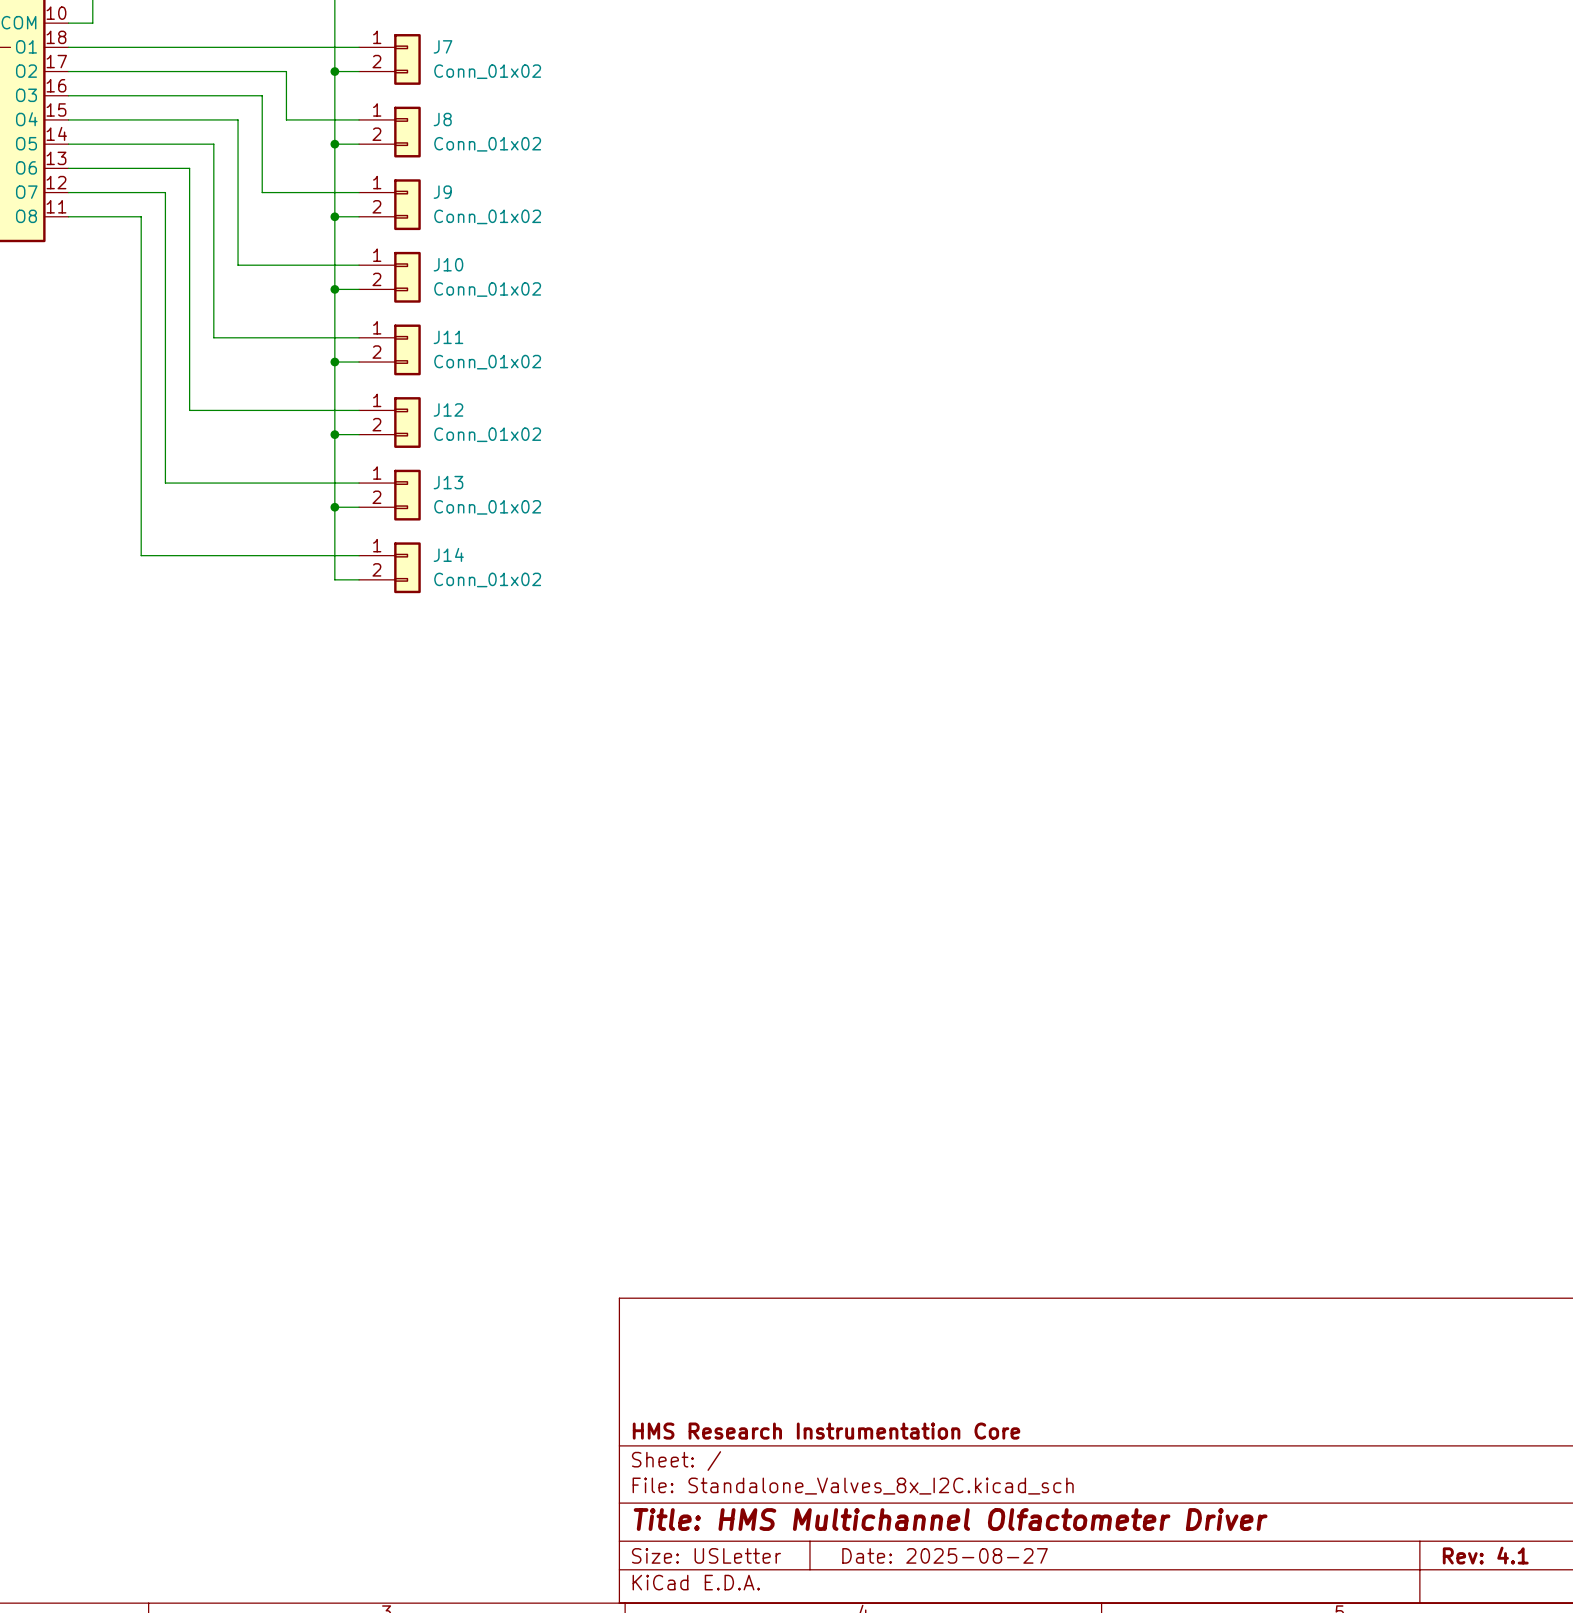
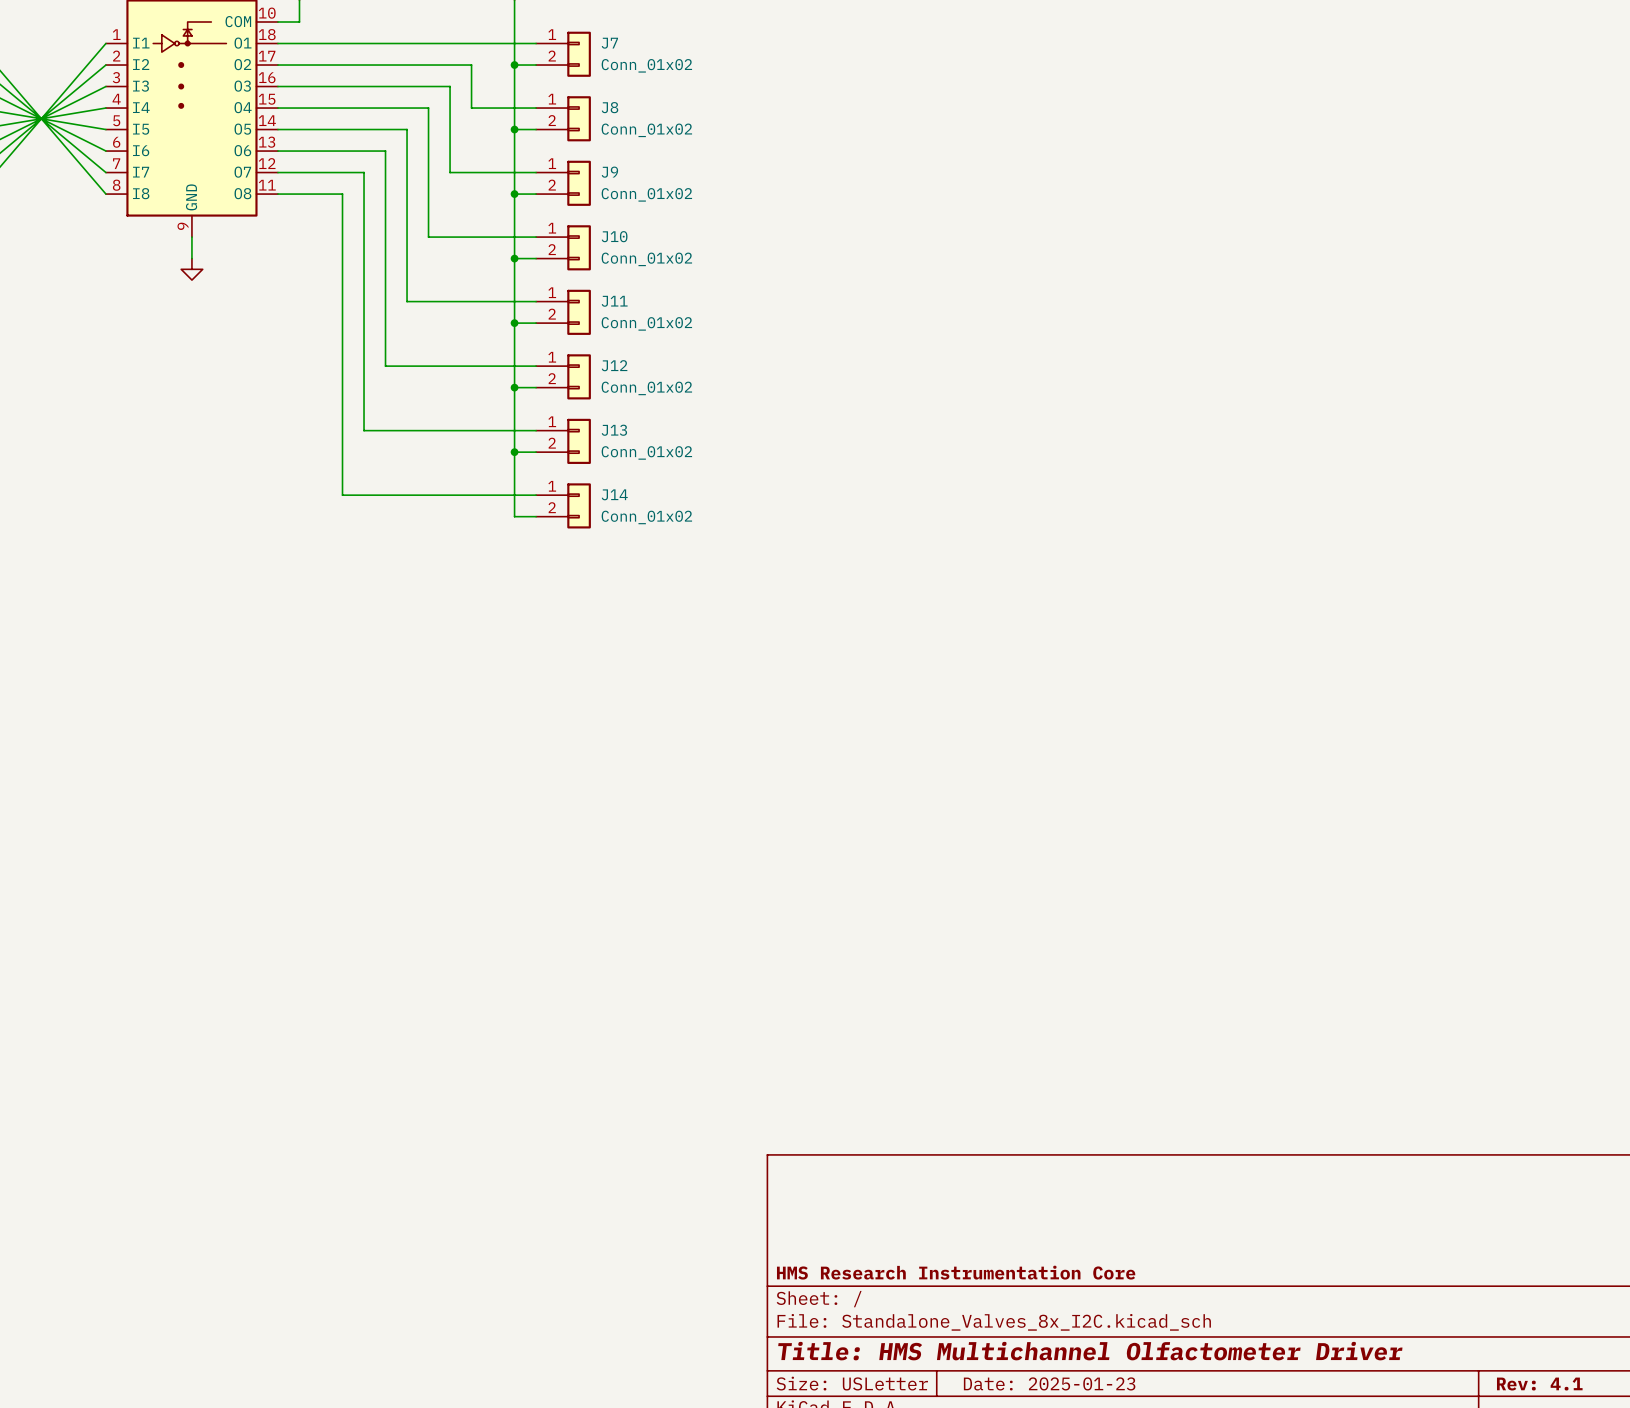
title block: Date: 2025-08-27 (945, 1555) -> Date: 2025-01-23 (1049, 1383)

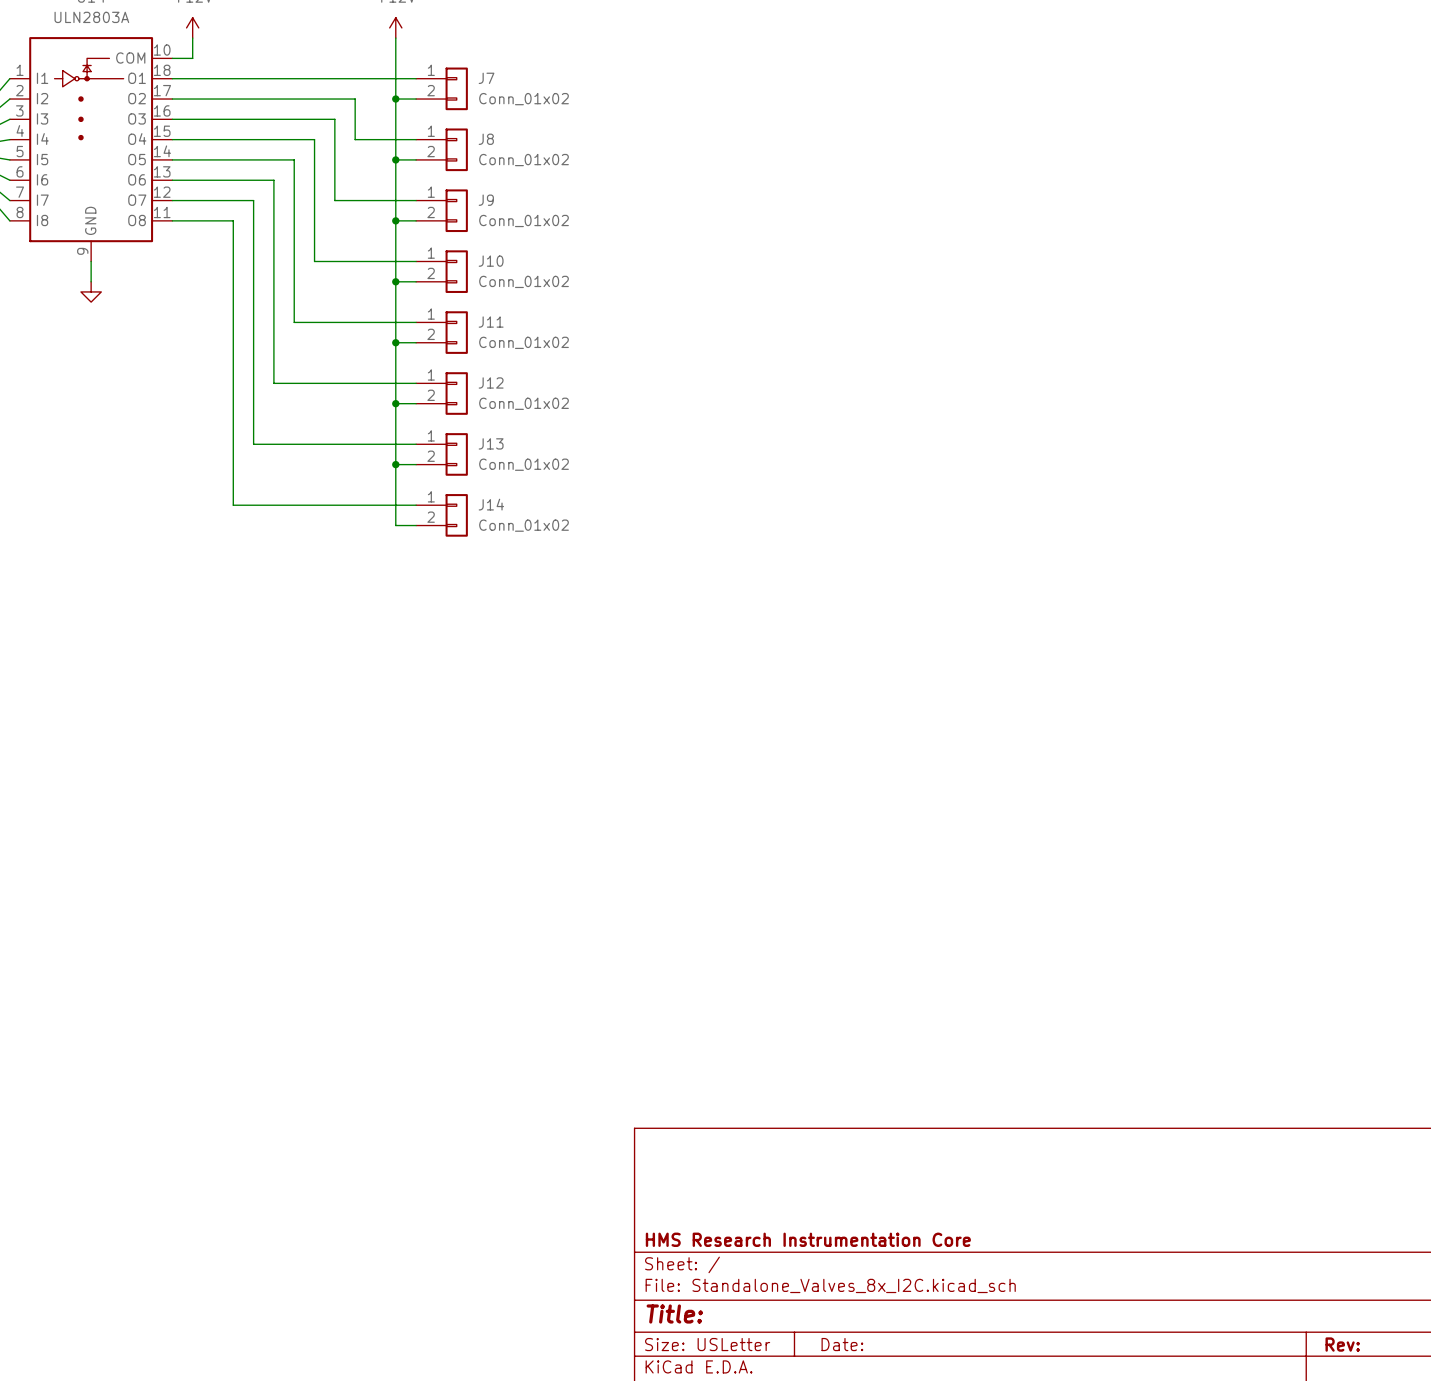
title block: Title: HMS Multichannel Olfactometer Driver (1090, 1351) -> Title: (674, 1314)
title block: Date: 2025-01-23 (1049, 1383) -> Date: (842, 1344)
title block: Rev: 4.1 (1539, 1384) -> Rev: (1342, 1344)

